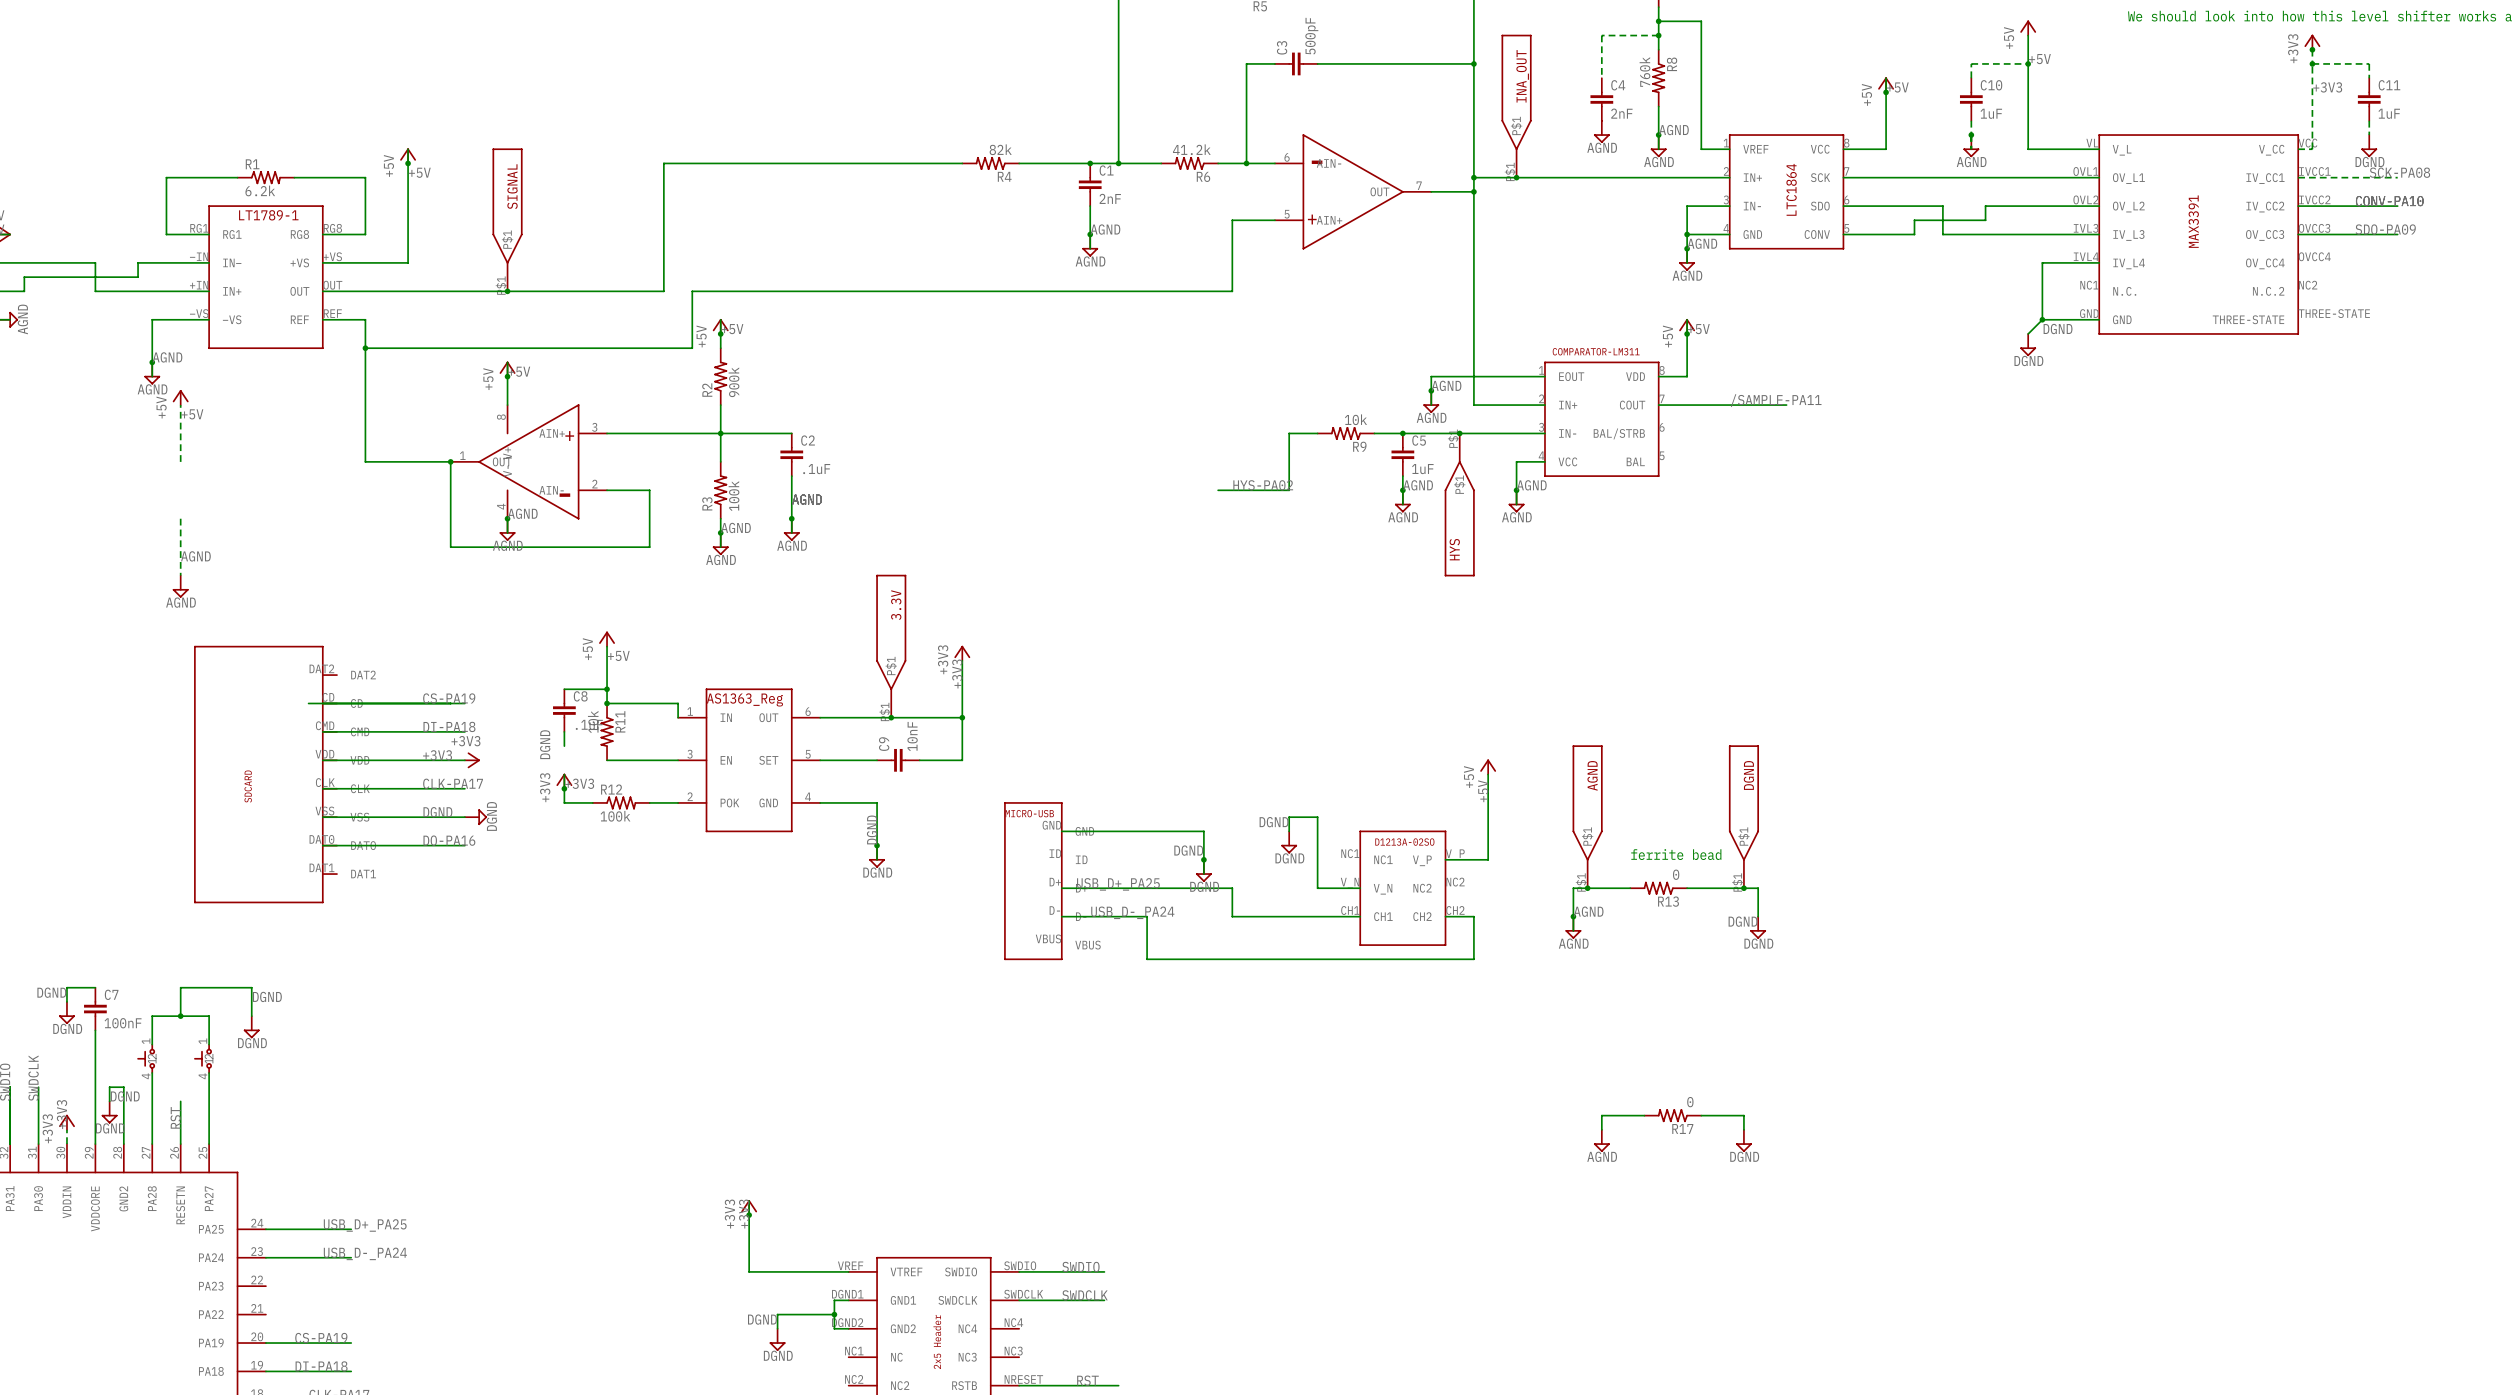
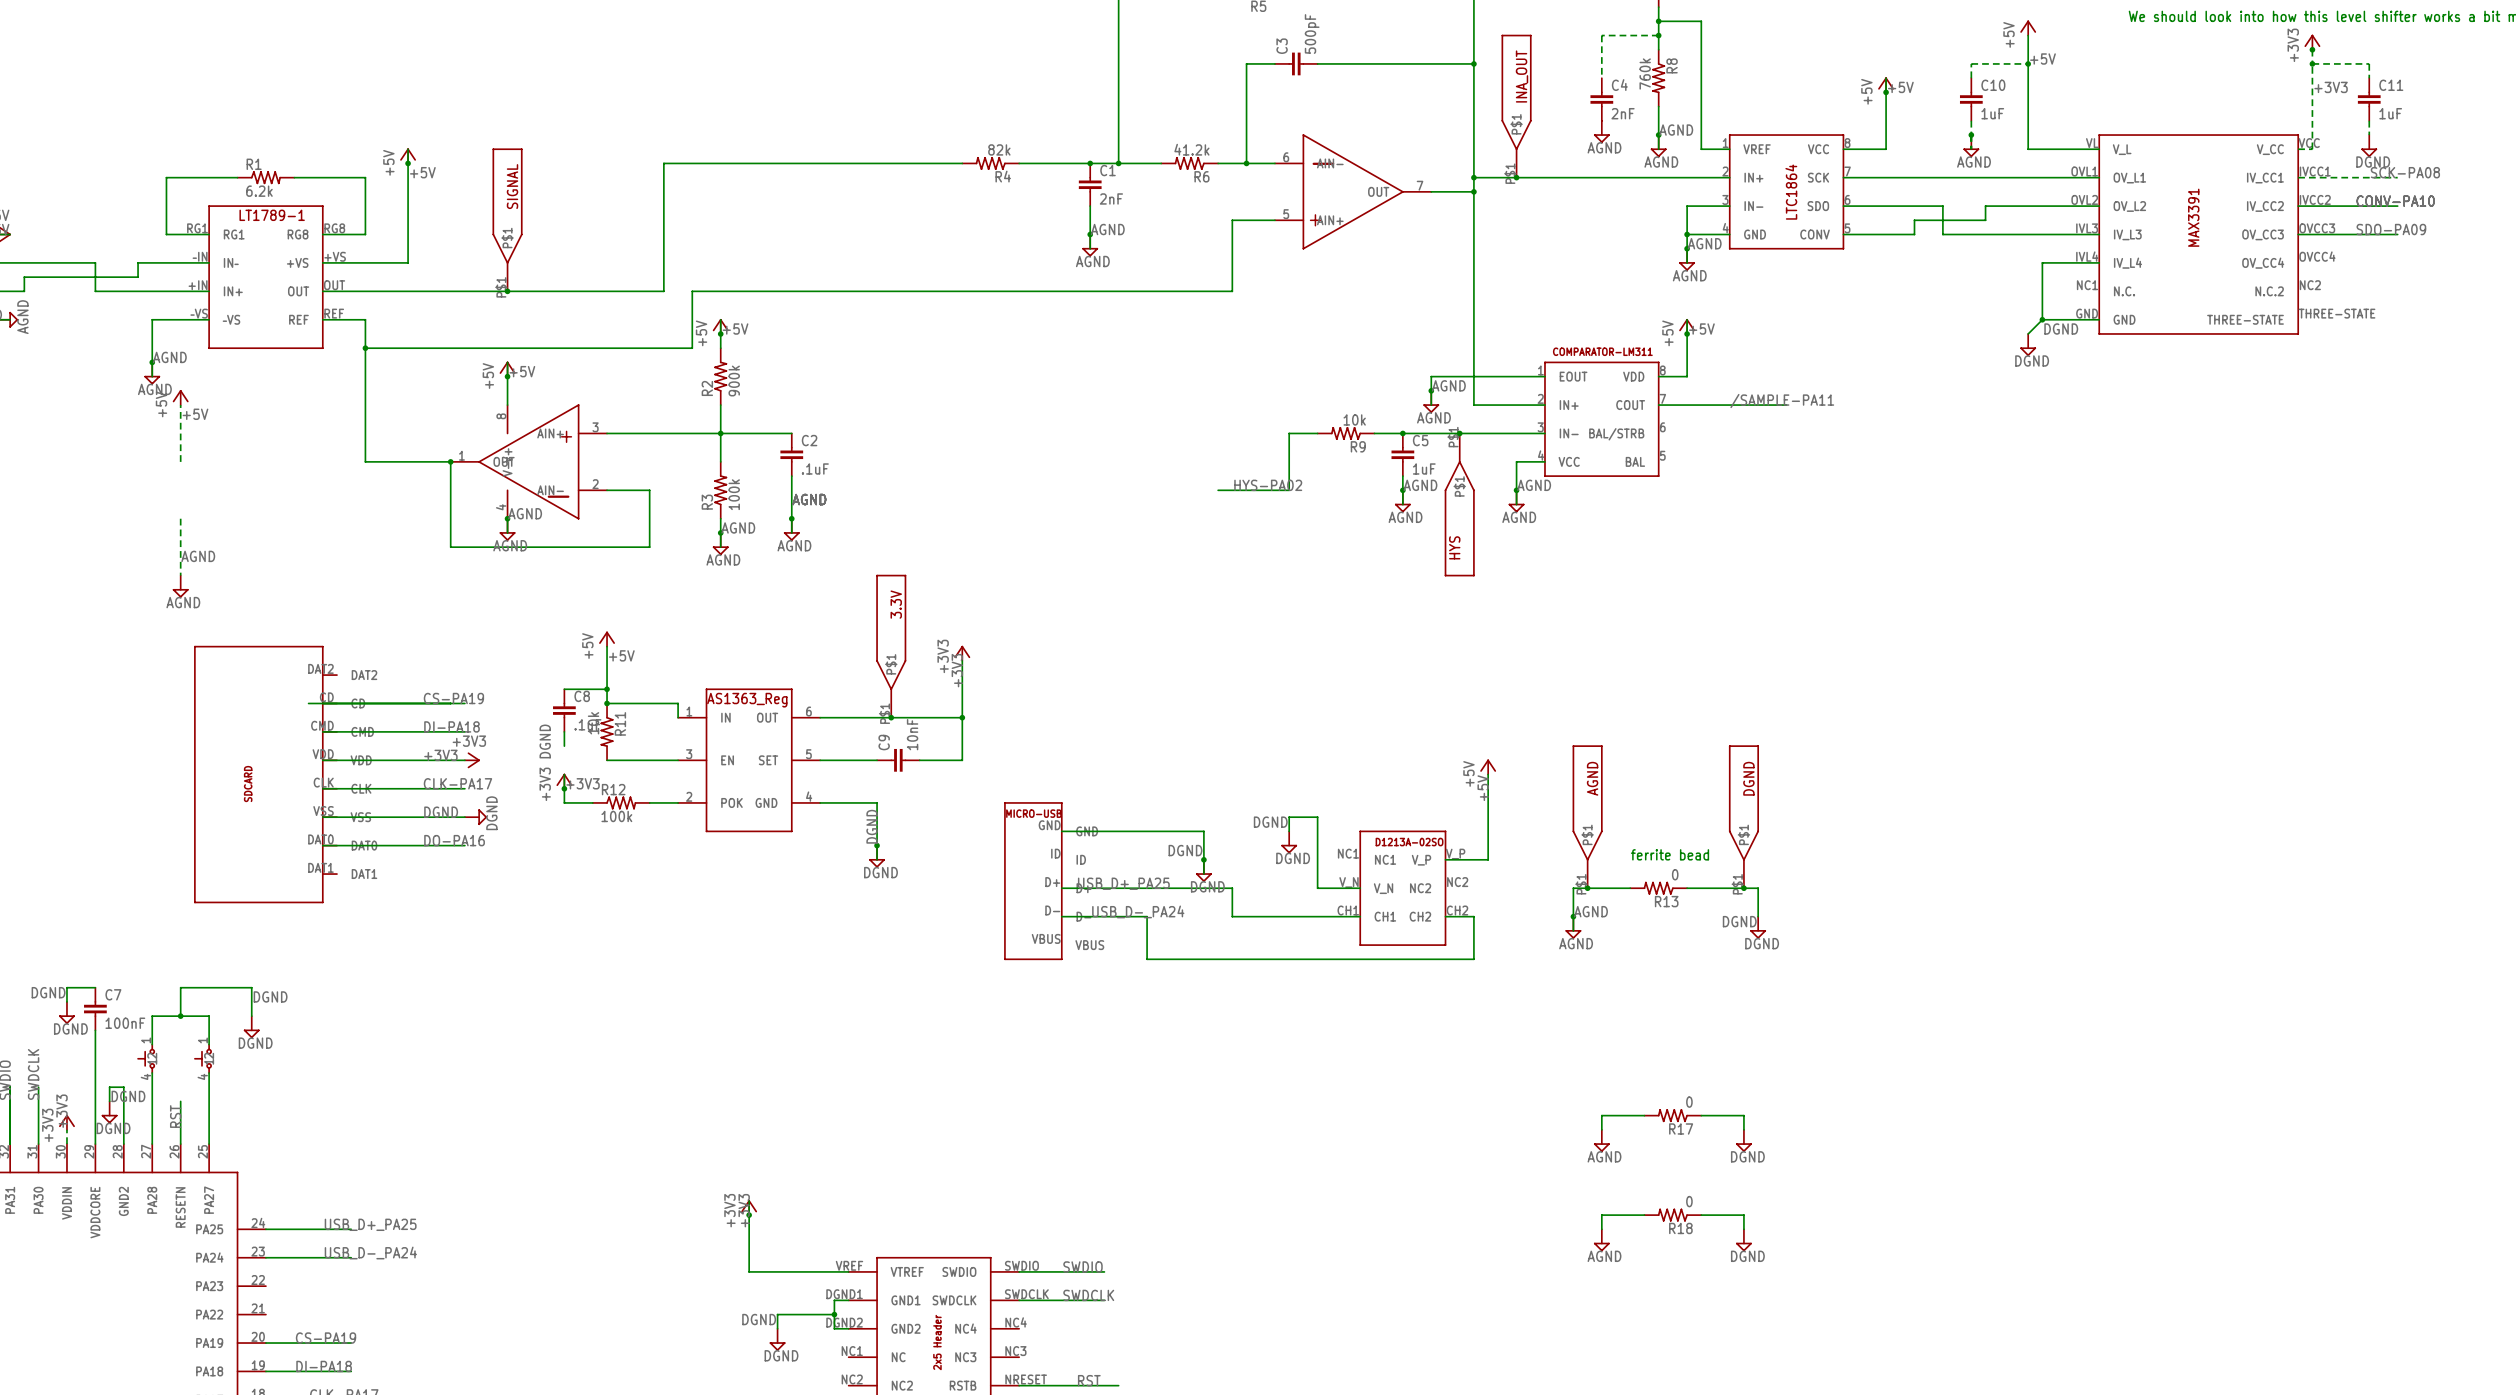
wire: none -> (1644, 1215) (1601, 1215) (1601, 1229)
R18: none -> 0 (1672, 1215)
wire: none -> (1701, 1215) (1743, 1215) (1743, 1229)
power symbol: none -> AGND (1601, 1240)
power symbol: none -> DGND (1743, 1240)

